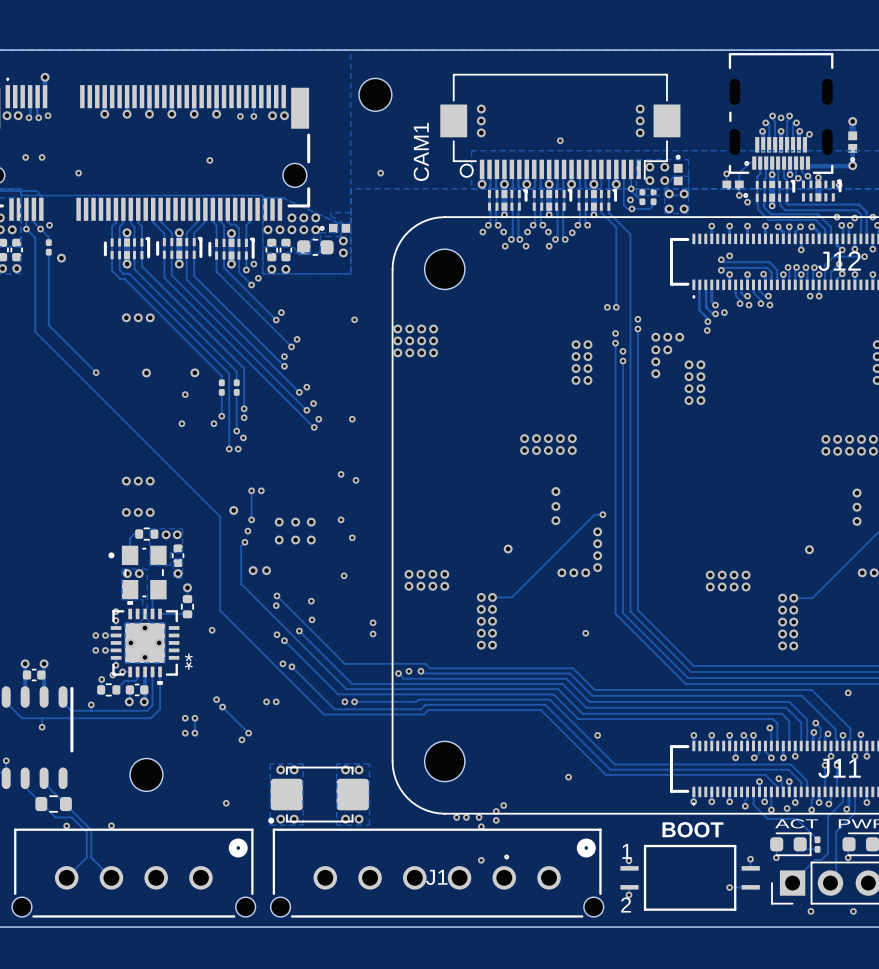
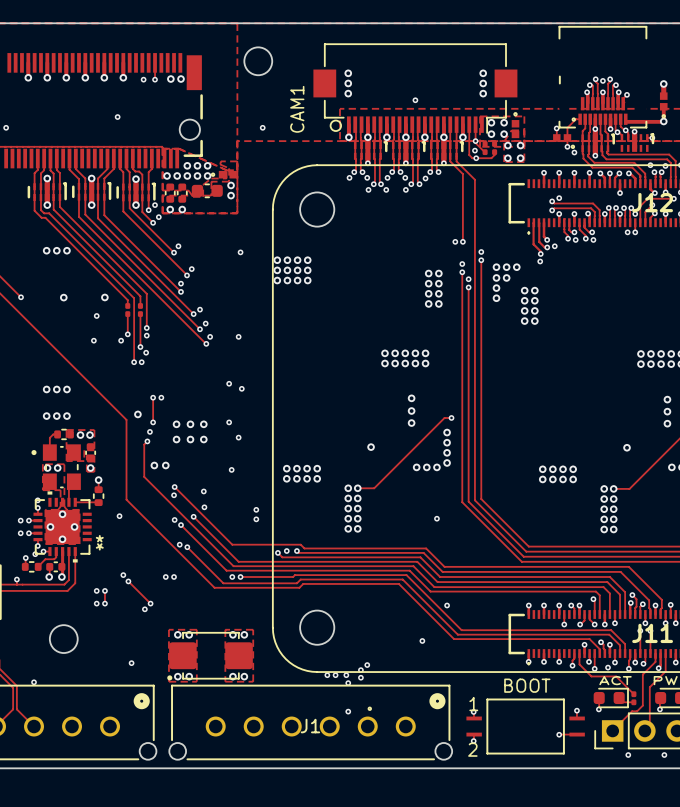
via: (848, 692) -> none

